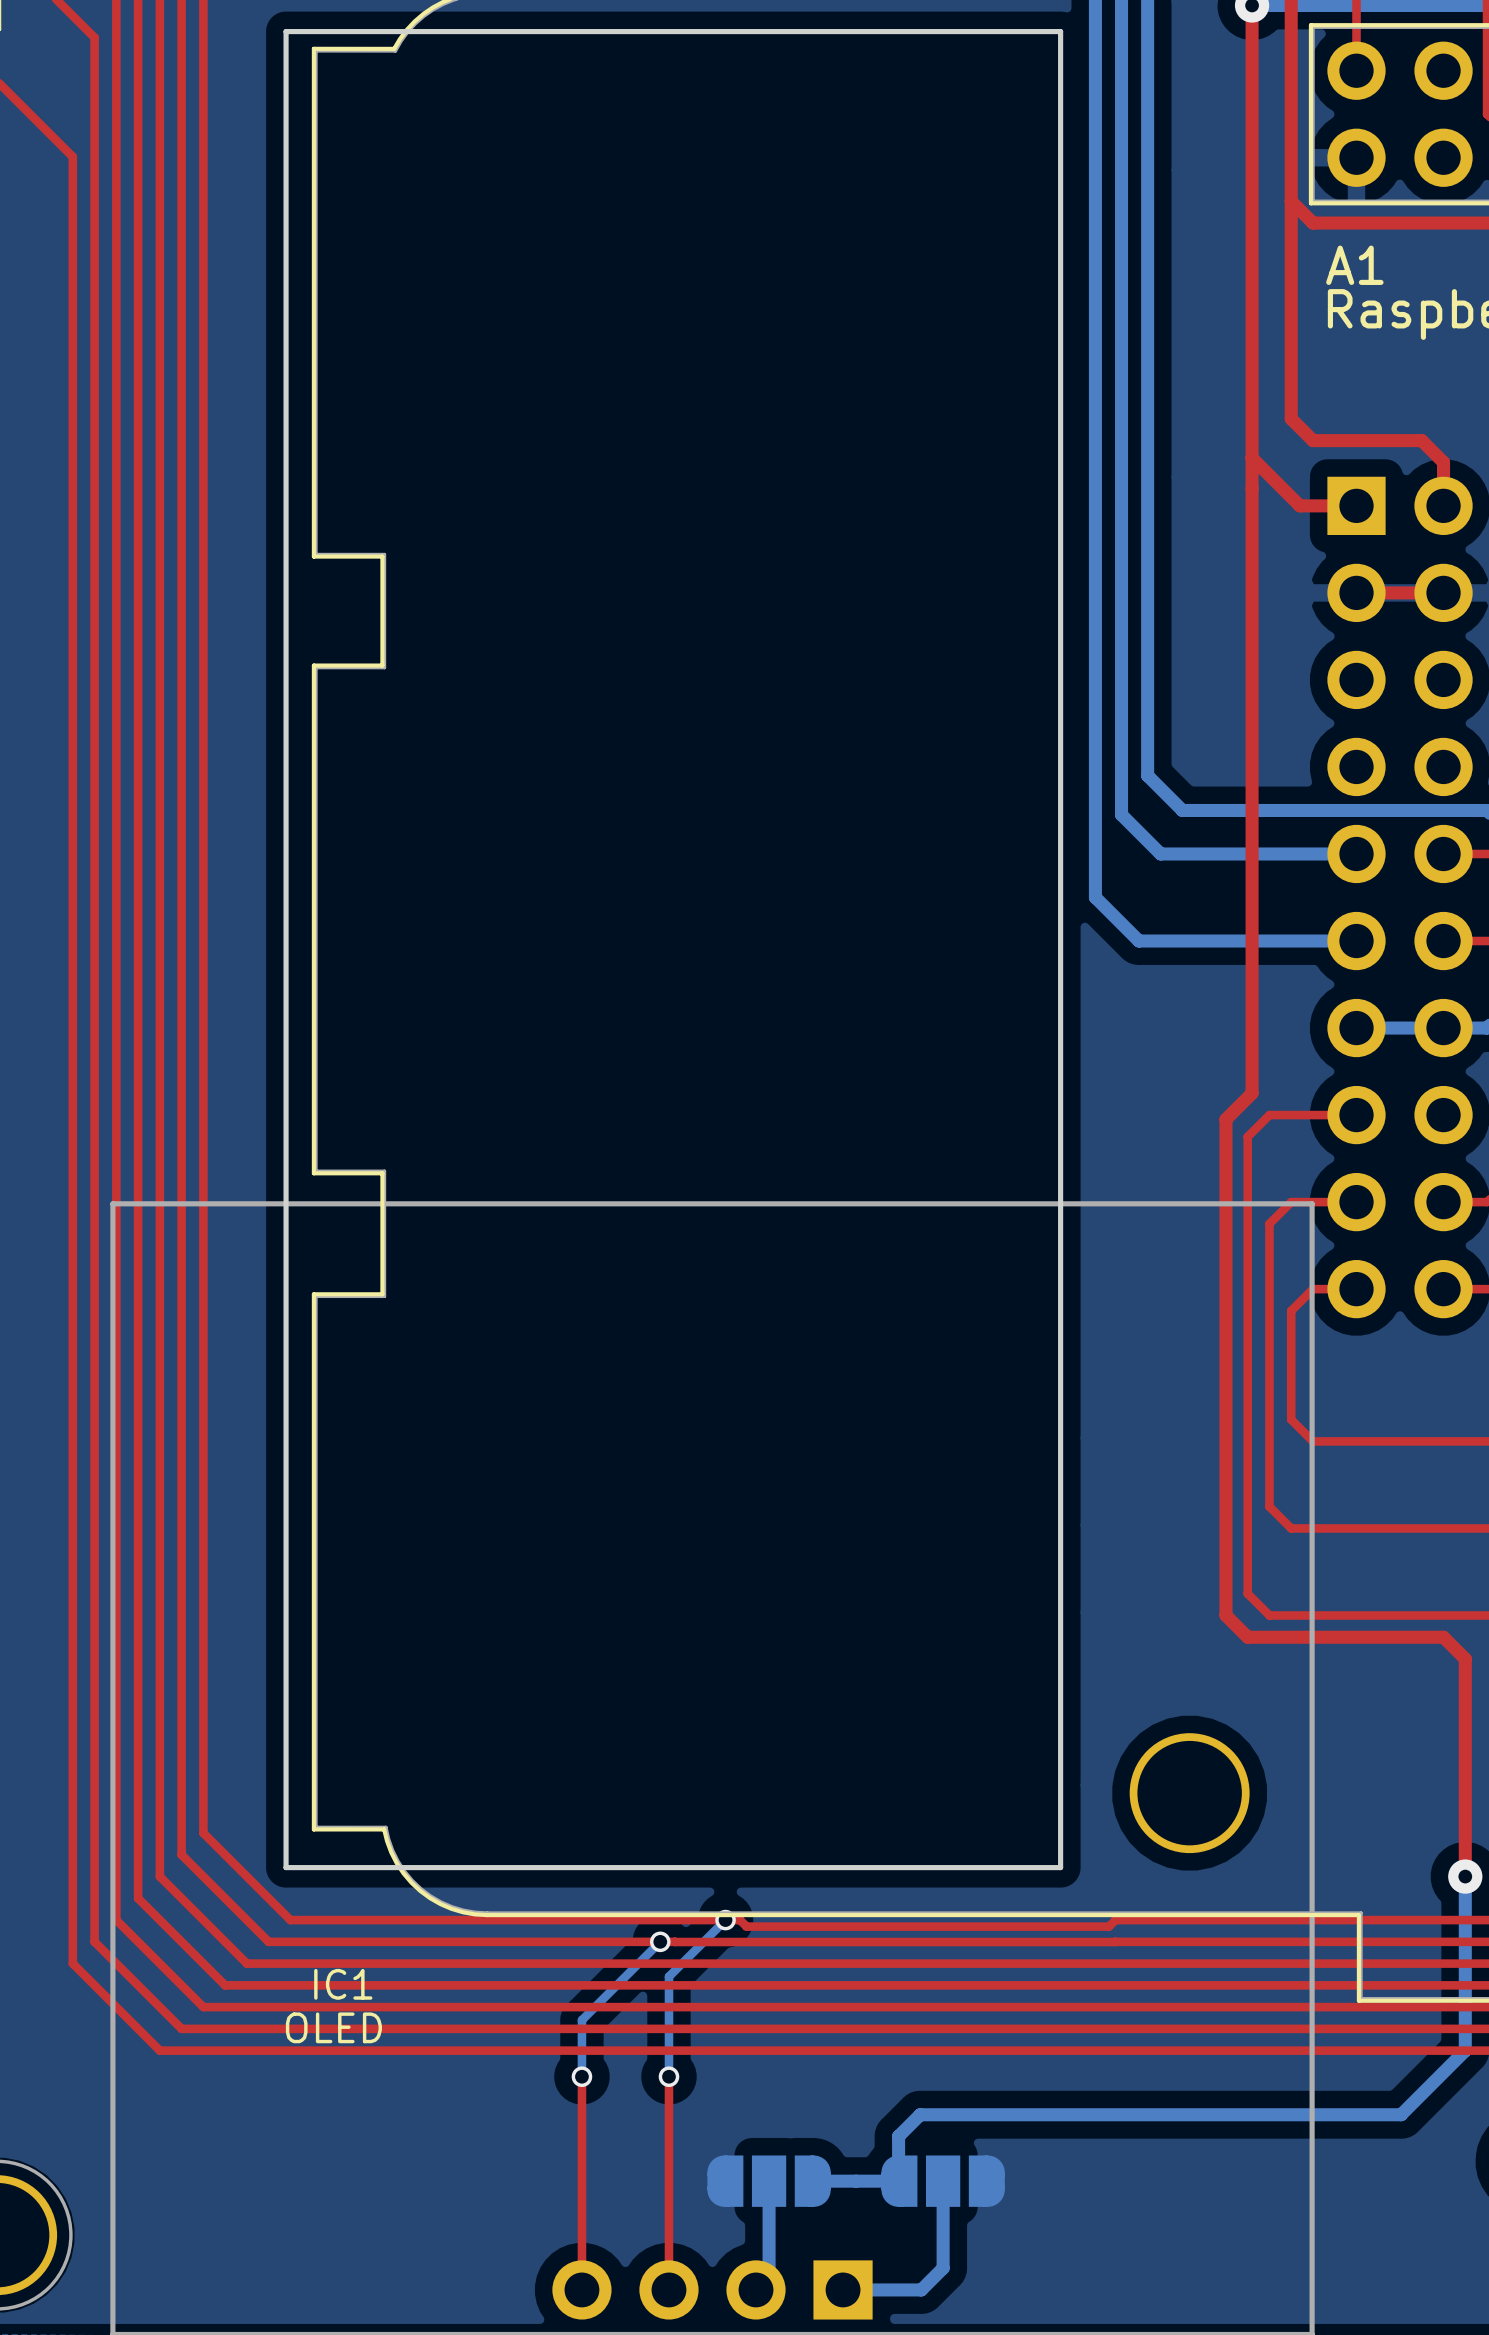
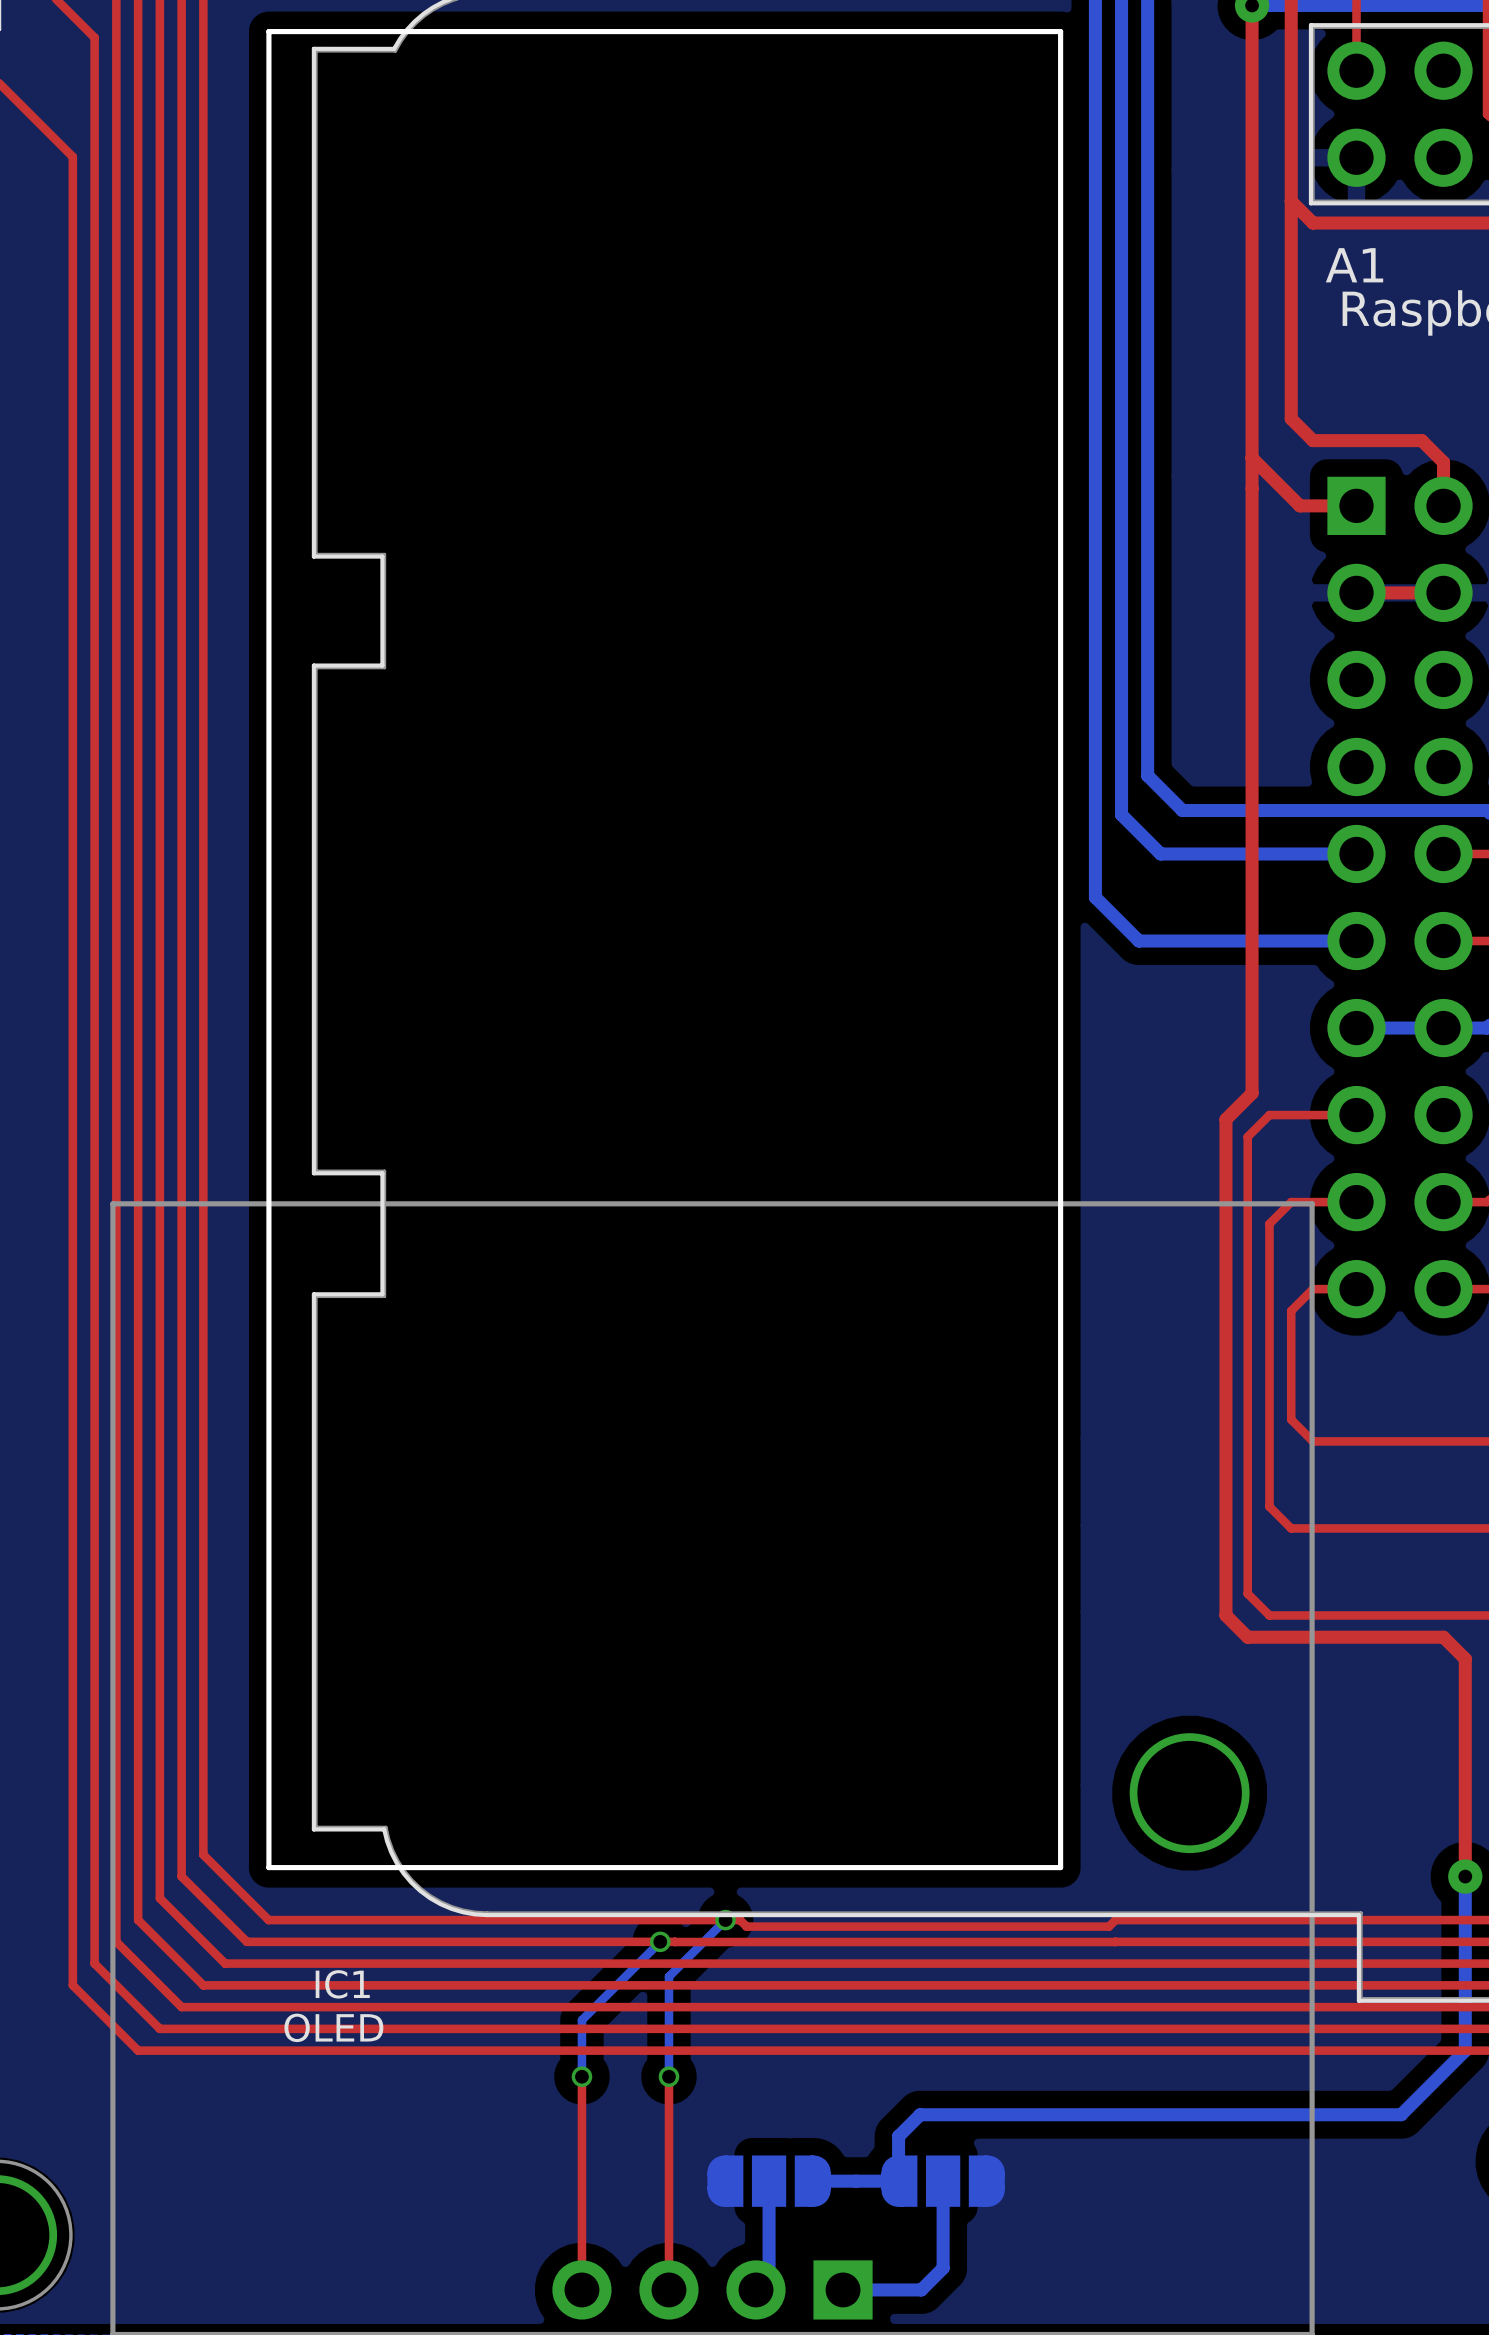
board edge: (286, 31) (286, 1867) -> (286, 31) (268, 31) (268, 1867) (286, 1867)
top track: (203, 1833) (290, 1920) -> (203, 1833) (203, 1854) (268, 1920) (290, 1920)
top track: (181, 1854) (268, 1941) -> (181, 1854) (181, 1876) (246, 1941) (268, 1941)
top track: (159, 1876) (246, 1963) -> (159, 1876) (159, 1898) (225, 1963) (246, 1963)
top track: (138, 1898) (225, 1985) -> (138, 1898) (138, 1920) (203, 1985) (225, 1985)
top track: (116, 1920) (203, 2007) -> (116, 1920) (116, 1941) (181, 2007) (203, 2007)
top track: (94, 1941) (181, 2028) -> (94, 1941) (94, 1963) (159, 2028) (181, 2028)
top track: (72, 1963) (159, 2050) -> (72, 1963) (72, 1985) (138, 2050) (159, 2050)

